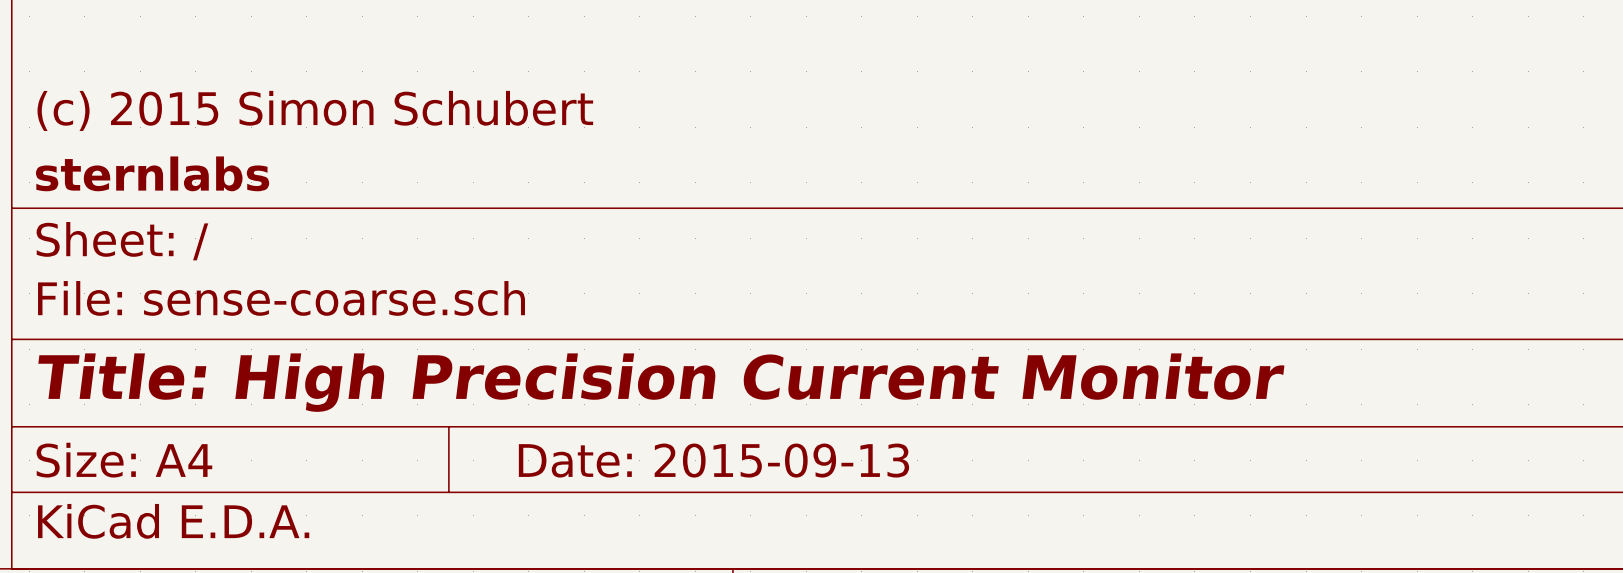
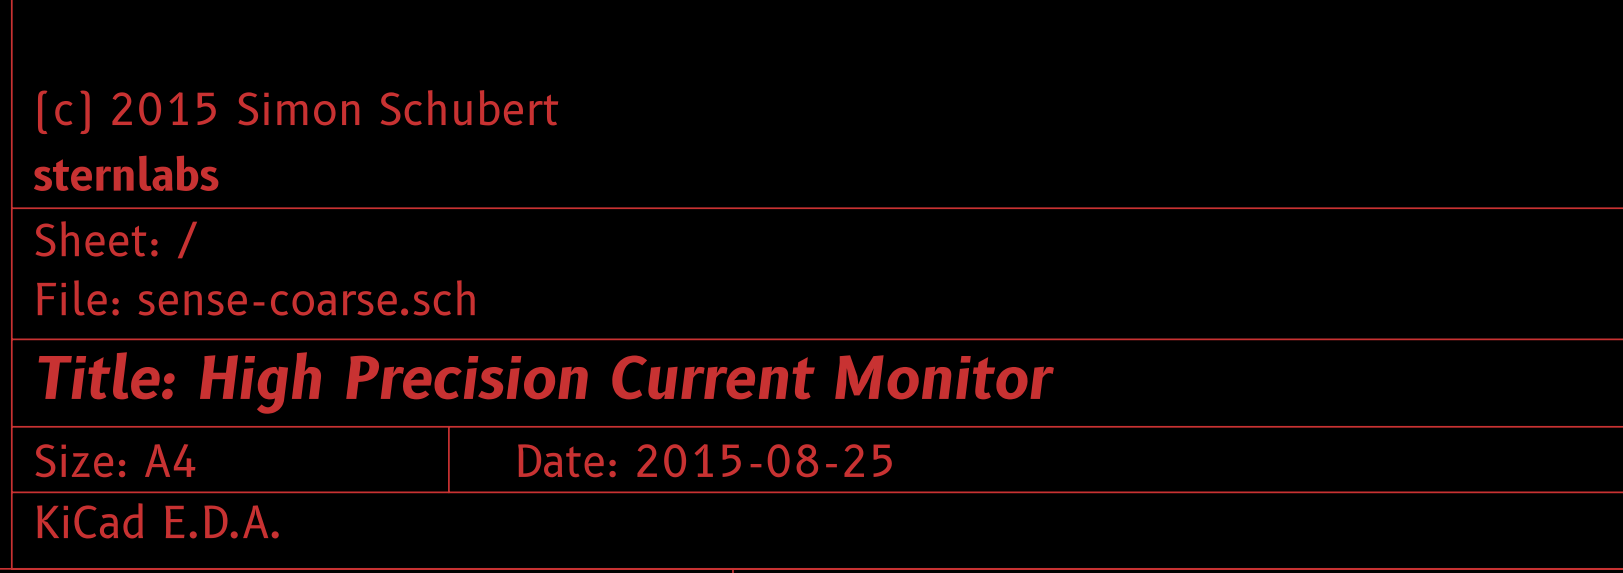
title block: Date: 2015-09-13 (713, 460) -> Date: 2015-08-25 (704, 460)

